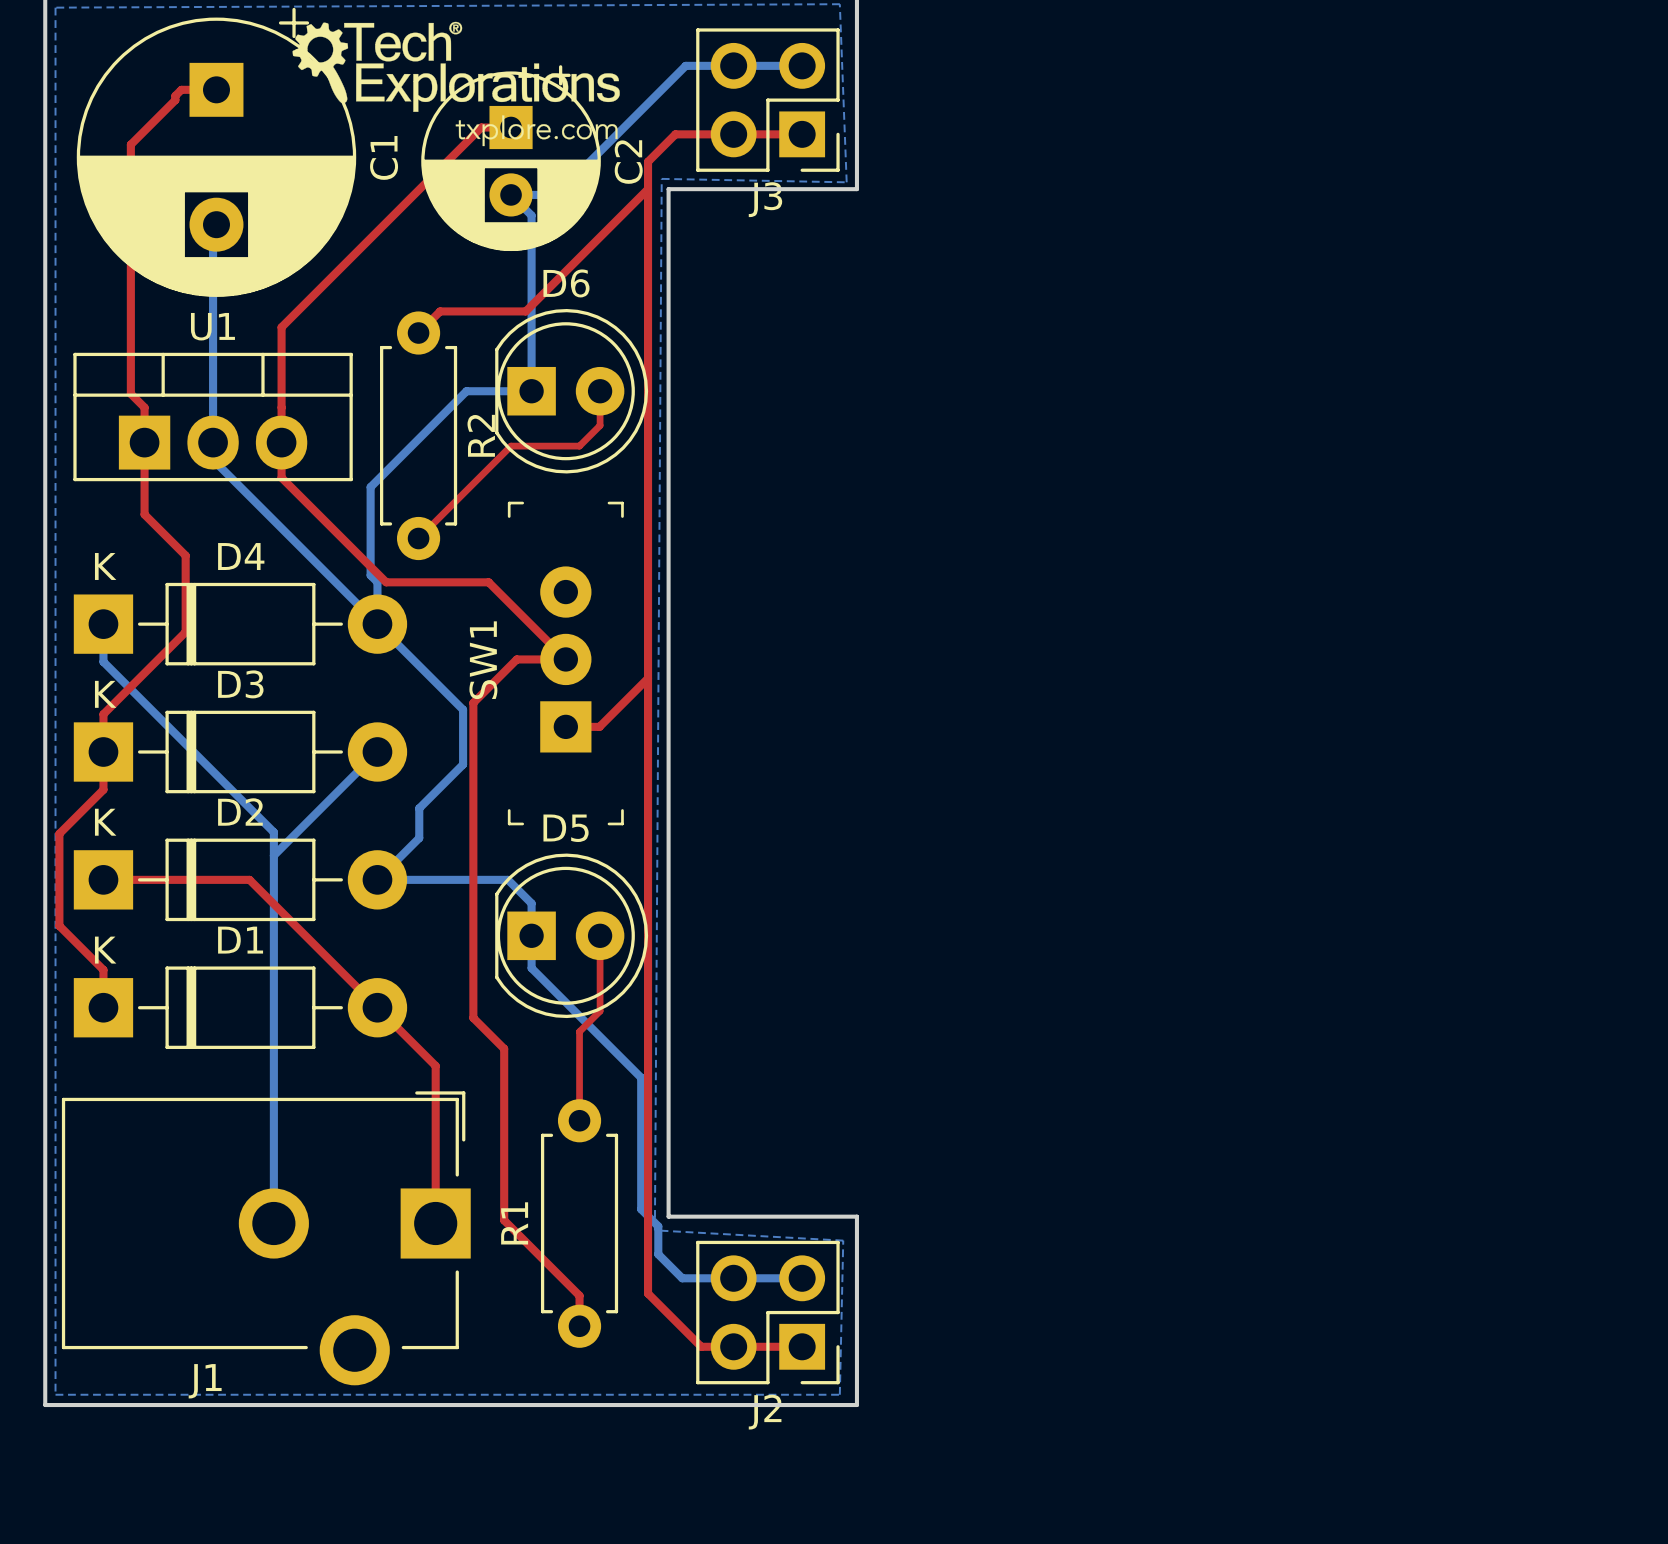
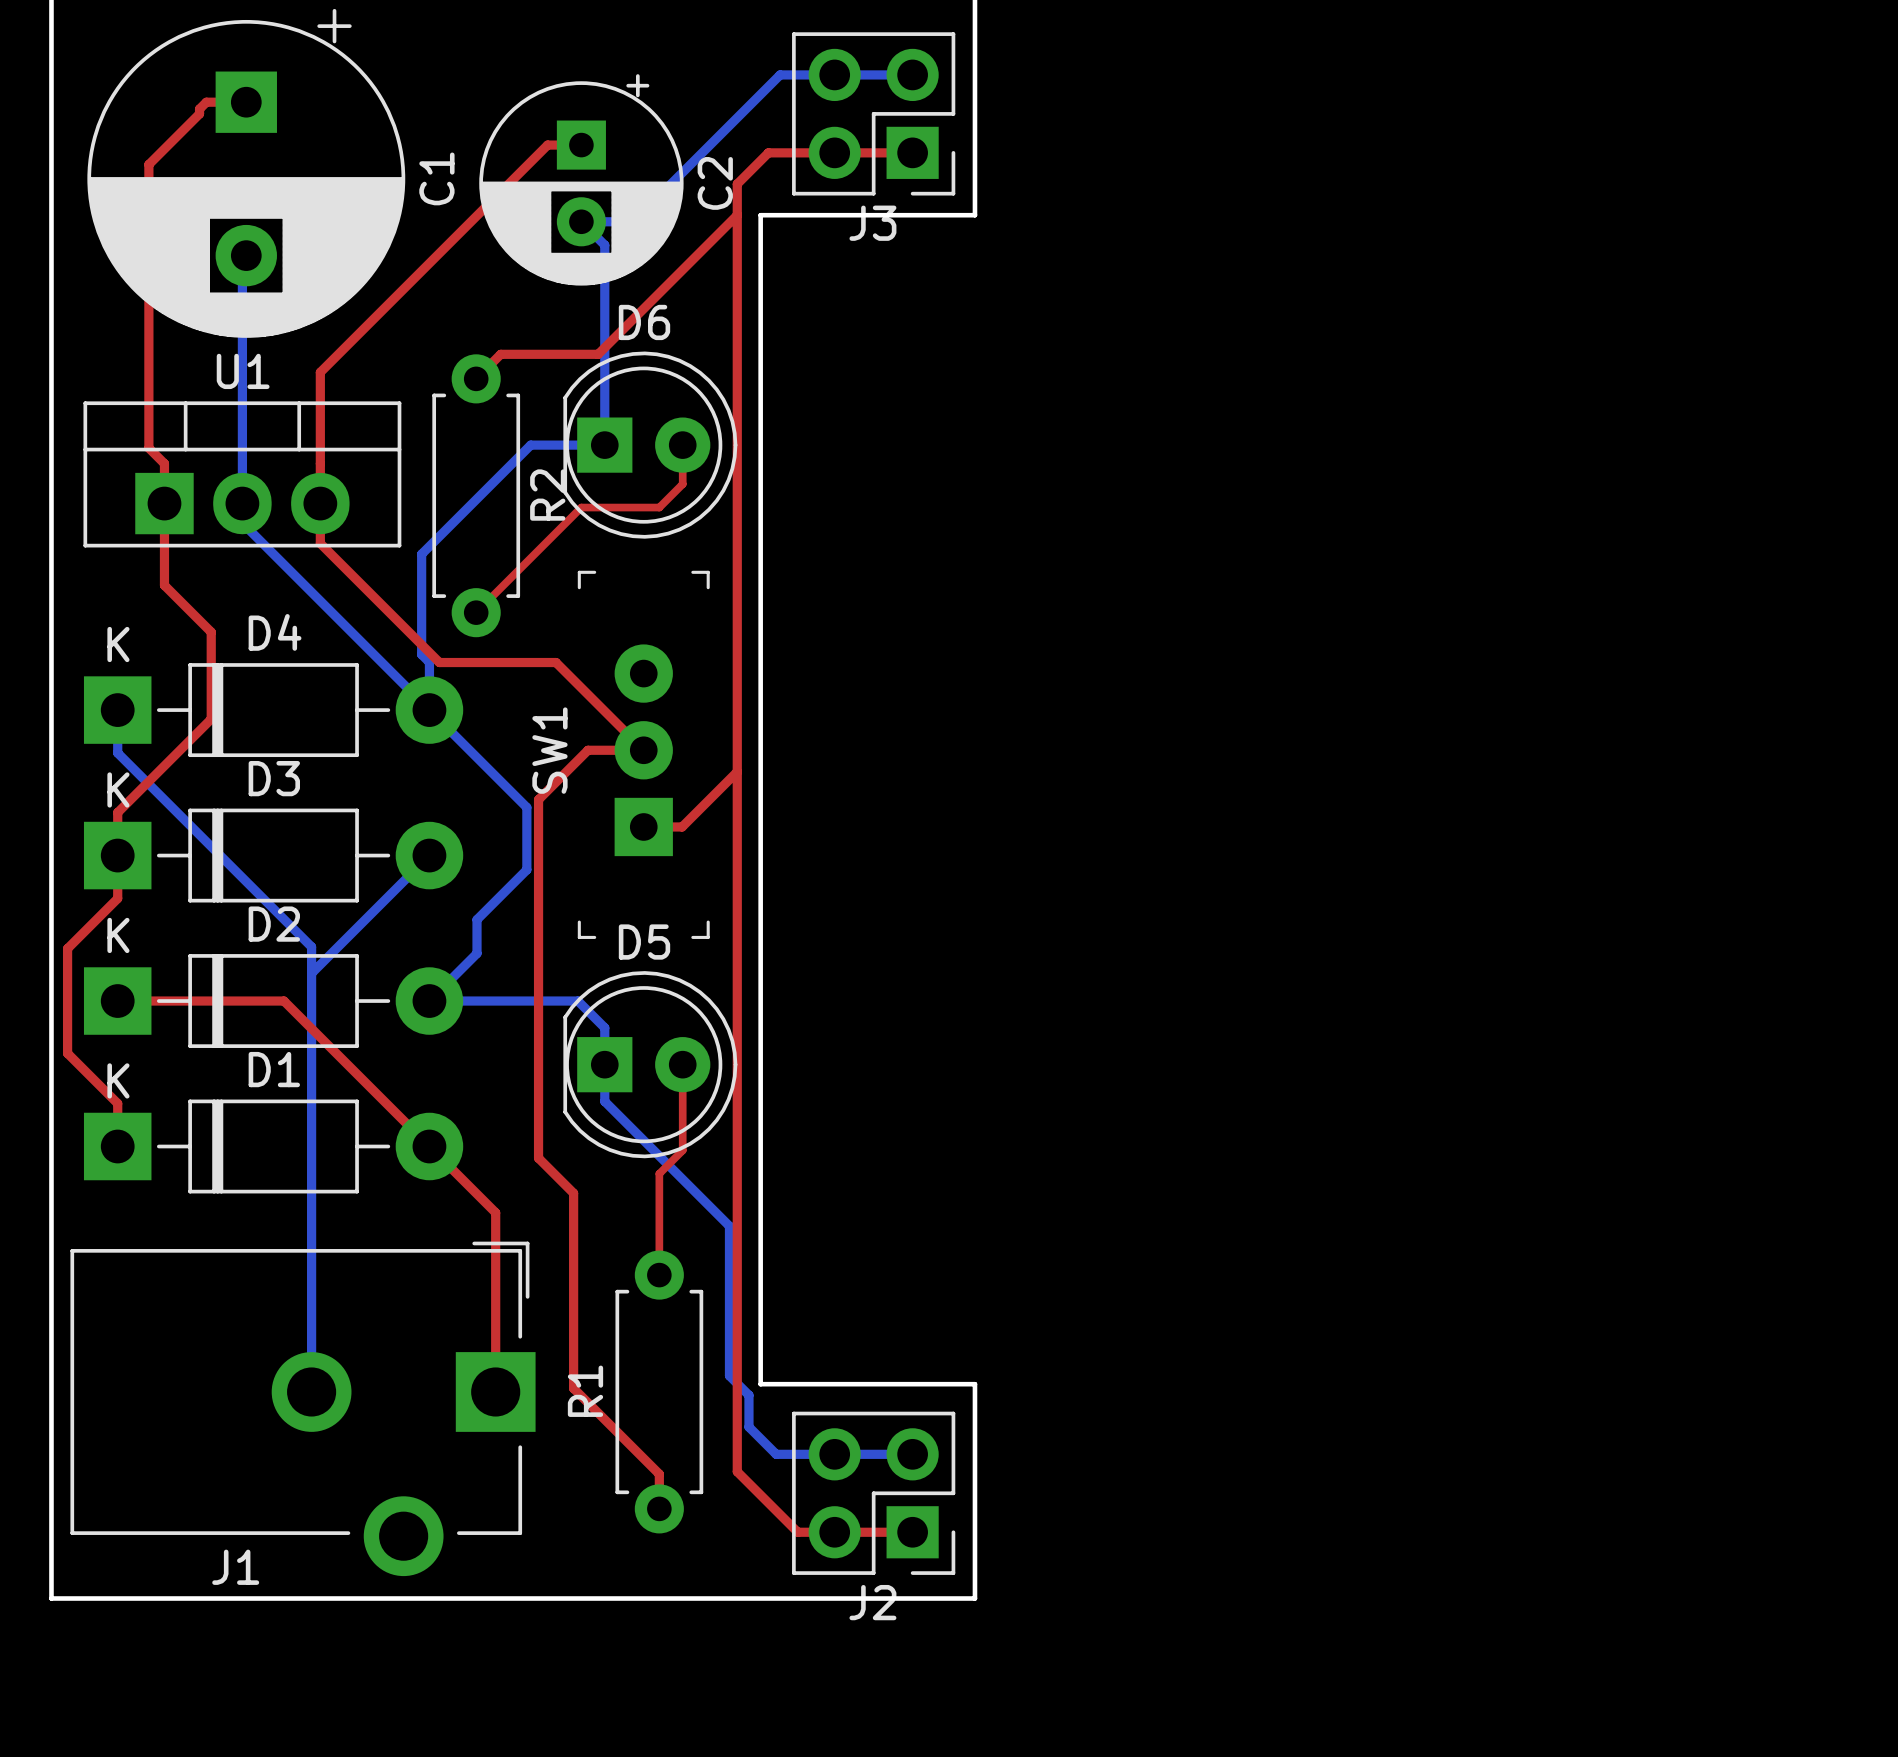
bottom zone outline: (839, 4) (846, 182) (661, 178) (654, 1230) (843, 1240) (839, 1394) (55, 1394) (55, 7) (839, 4) -> none
drawing: [292, 21, 620, 147] -> none

